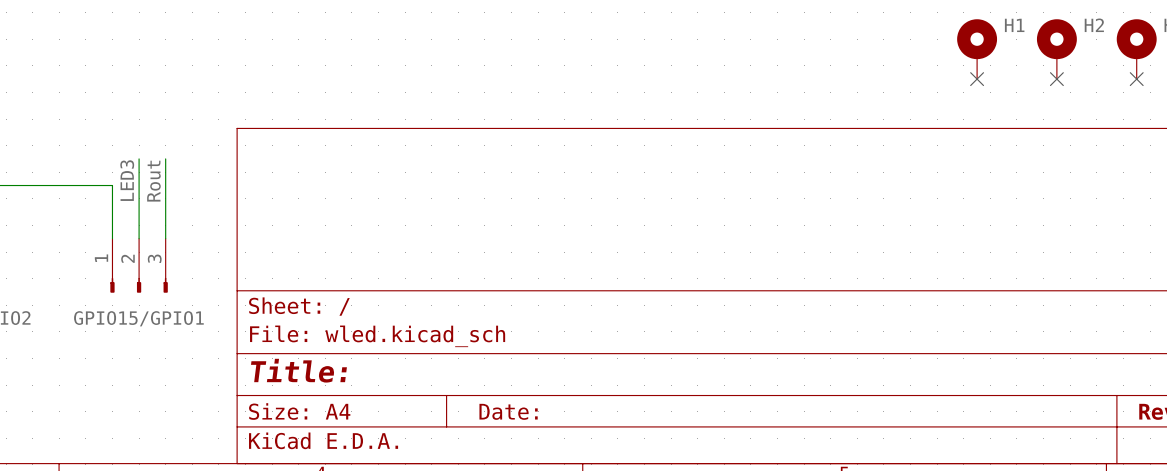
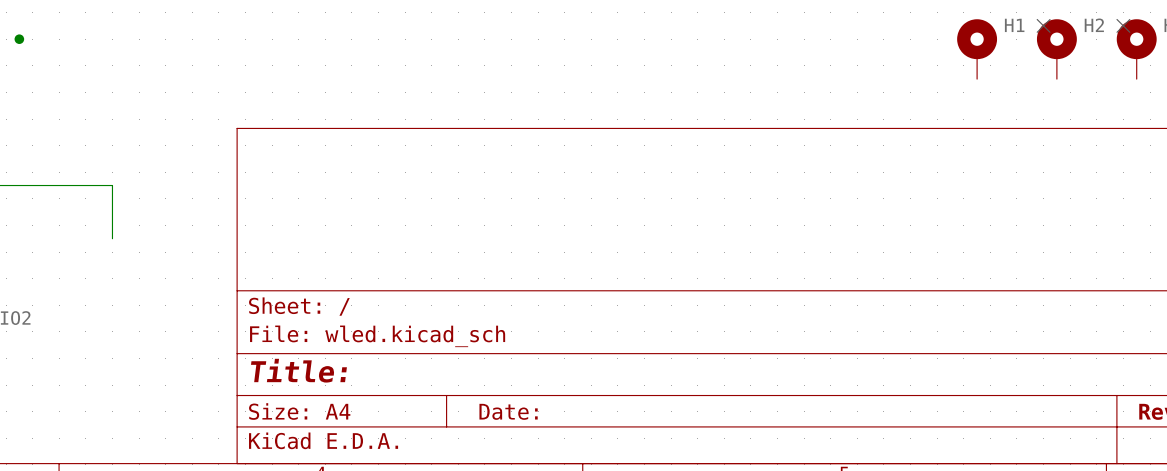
no-connect mark: none -> (1043, 25)
no-connect mark: none -> (1123, 25)
junction: none -> (19, 39)
no-connect mark: (977, 79) -> none
no-connect mark: (1056, 79) -> none
no-connect mark: (1136, 79) -> none
wire: (139, 158) (139, 238) -> none
wire: (165, 158) (165, 238) -> none
label: LED3 (127, 180) -> none
label: Rout (153, 181) -> none
GPIO15/GPIO1: (139, 265) -> none

